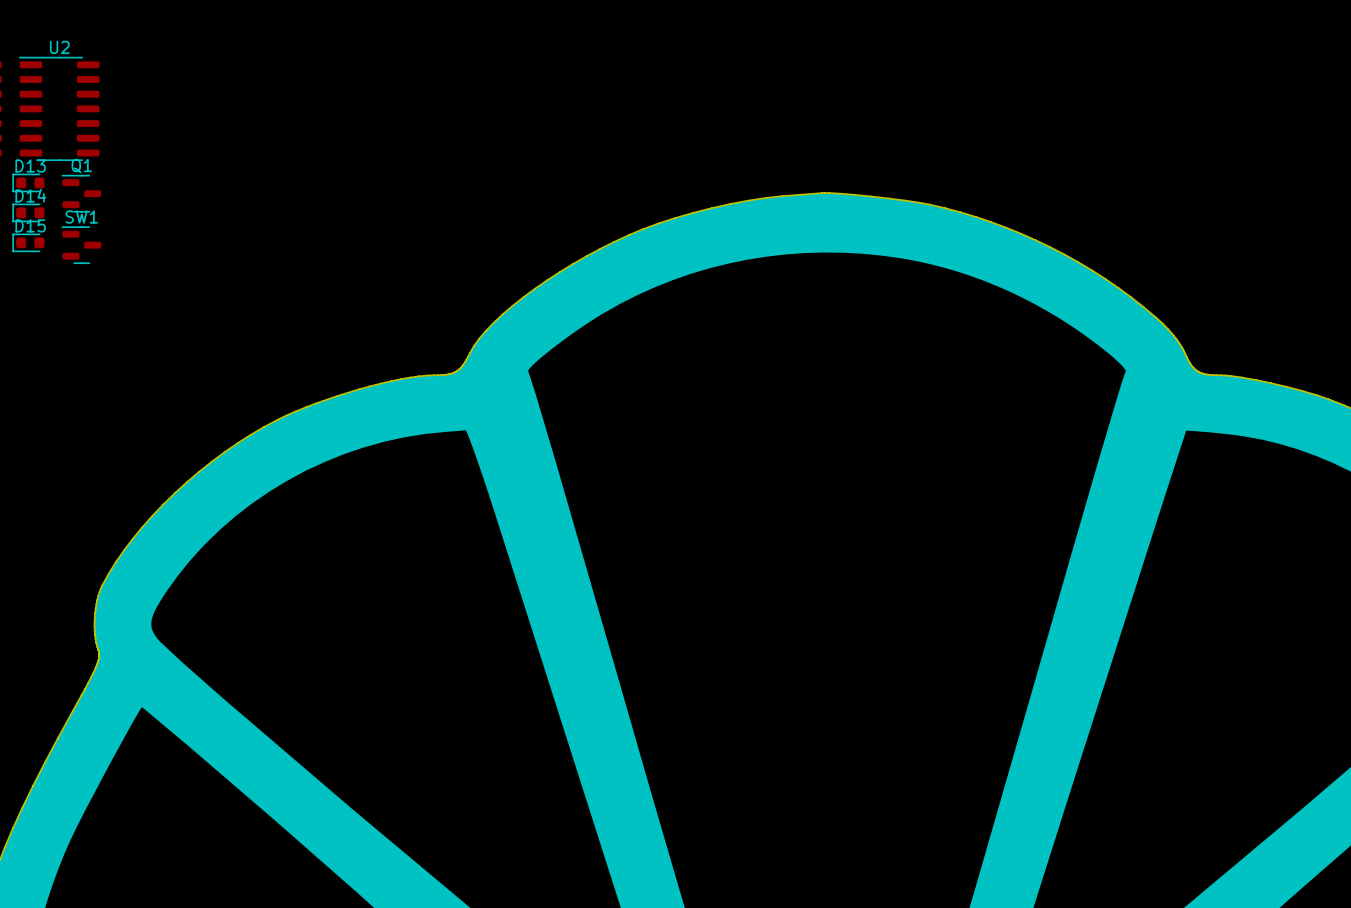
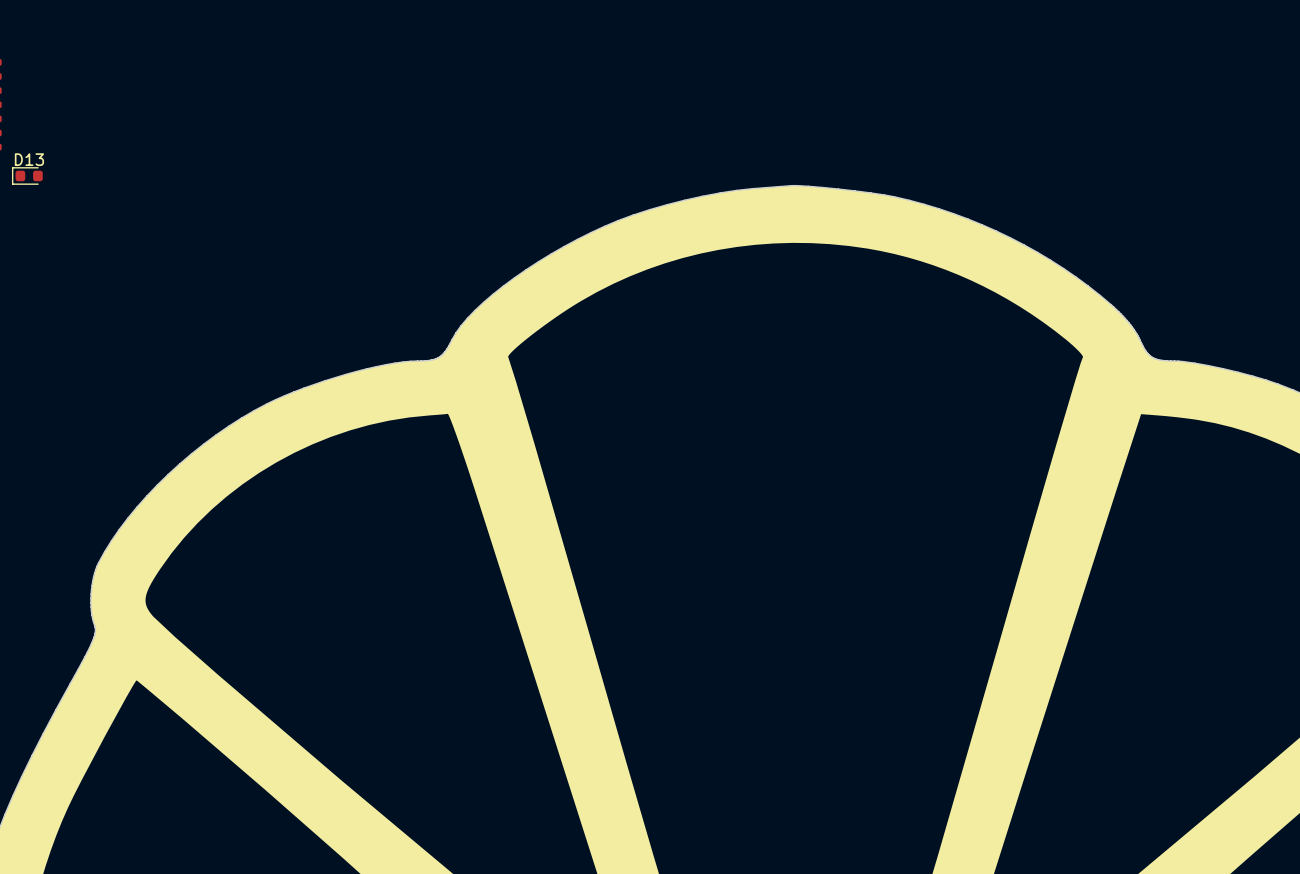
U2: (59, 108) -> none
Q1: (81, 193) -> none
D14: (28, 212) -> none
D15: (28, 242) -> none
SW1: (81, 245) -> none

